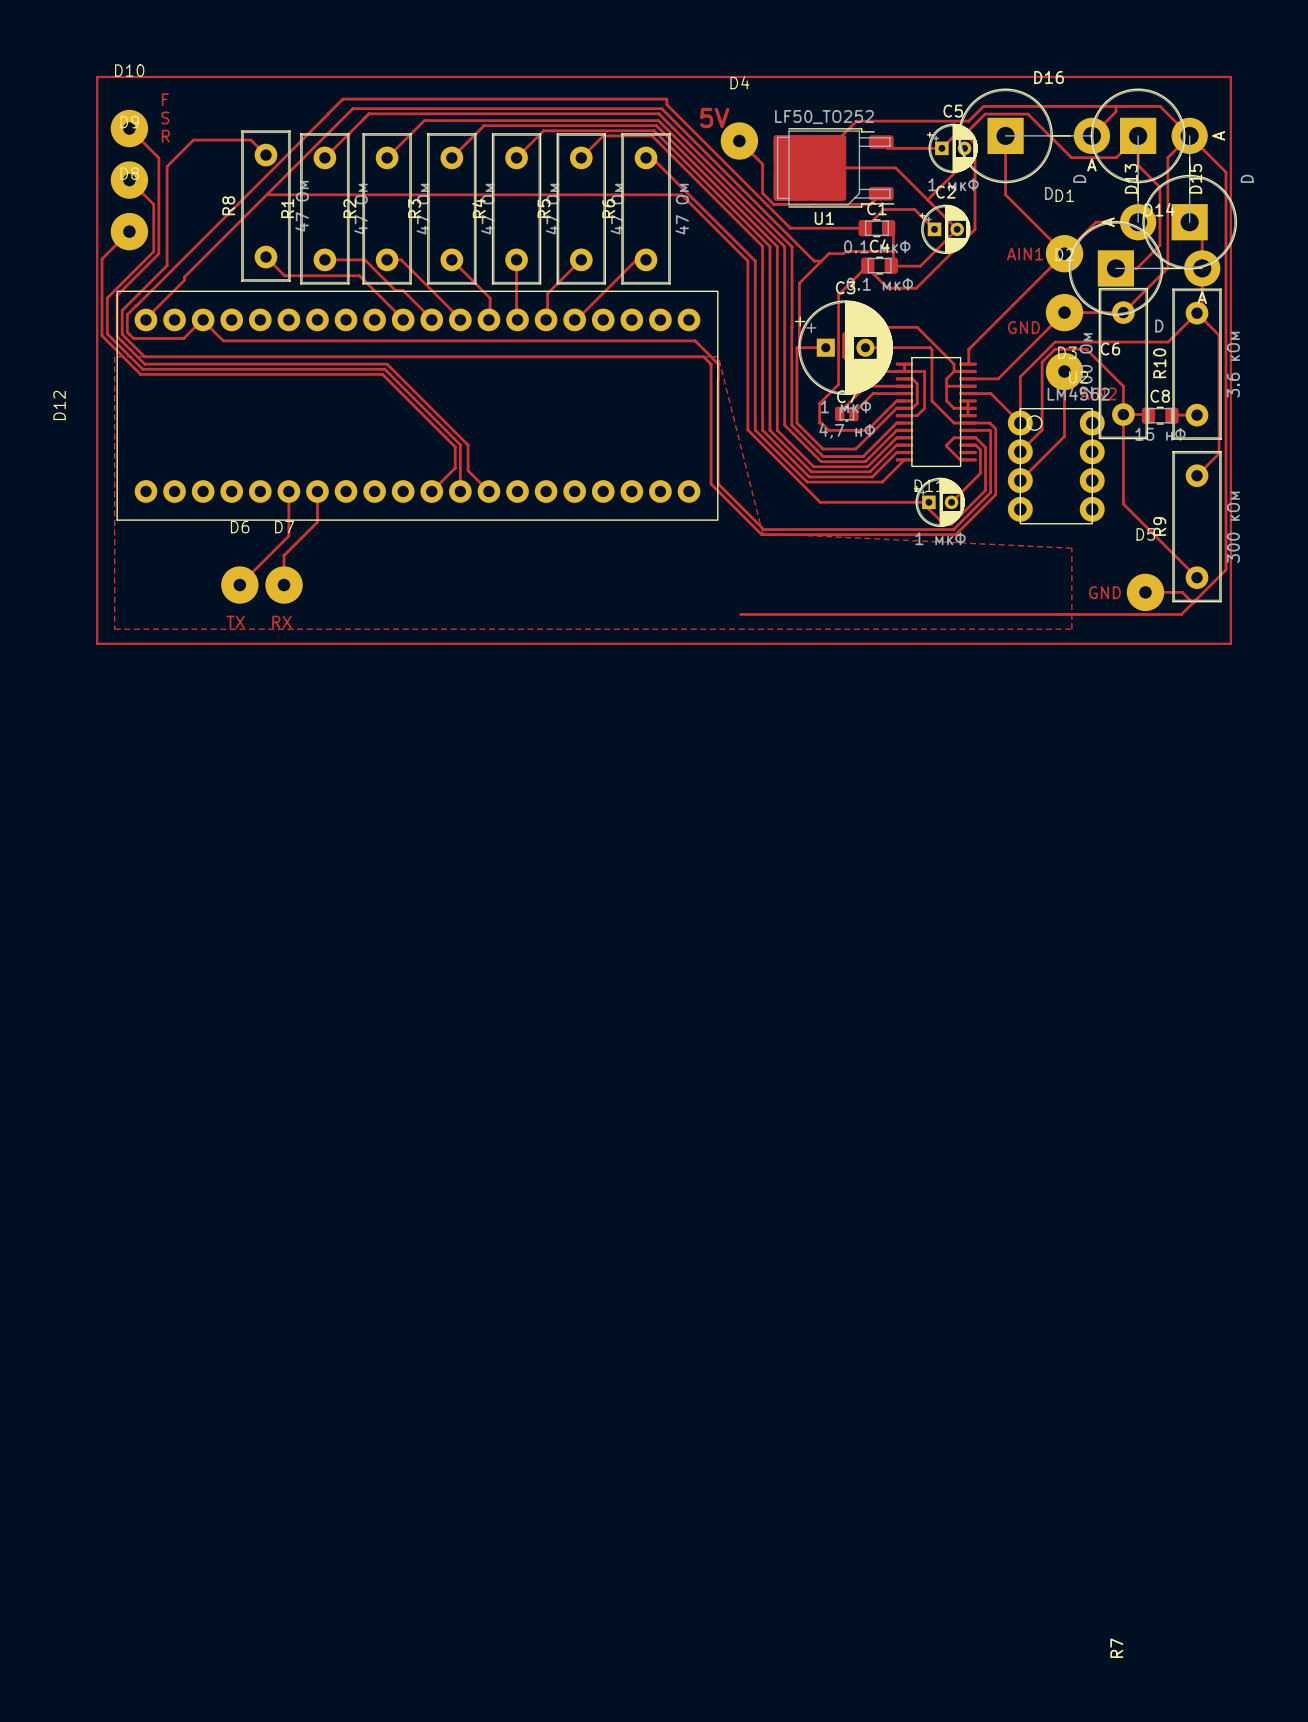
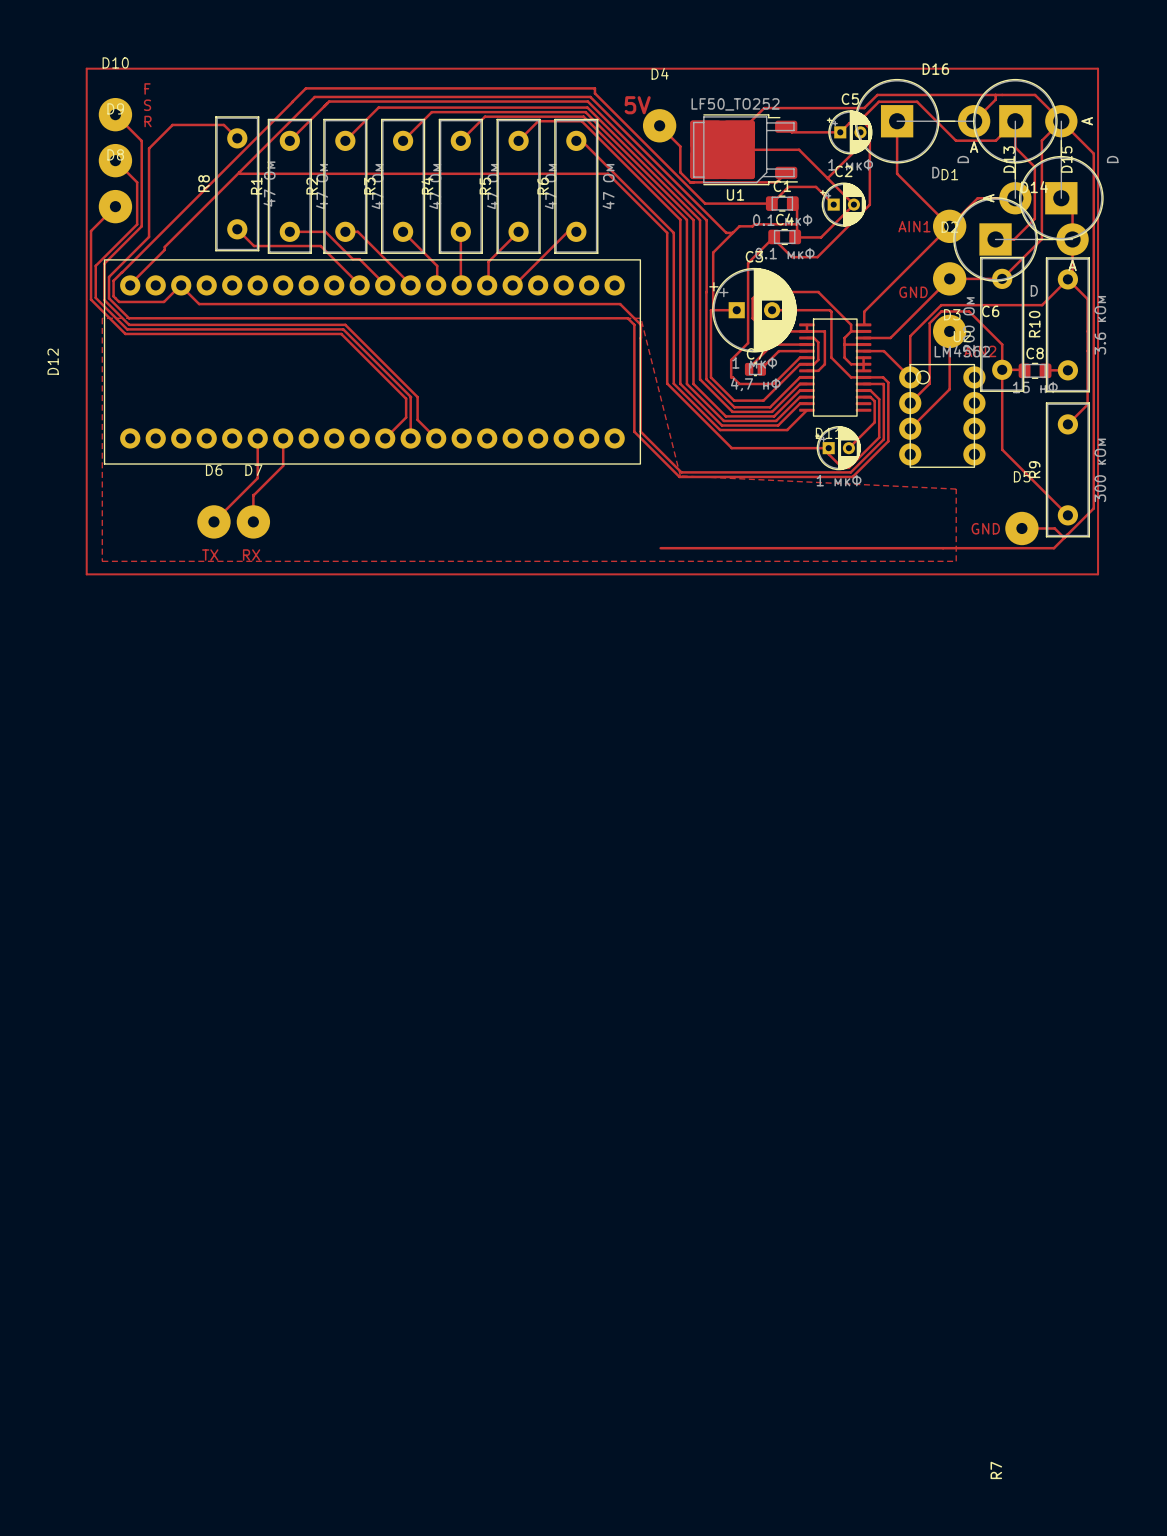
top track: (967, 437) (954, 437) (946, 445) (960, 459) (967, 459) -> none

